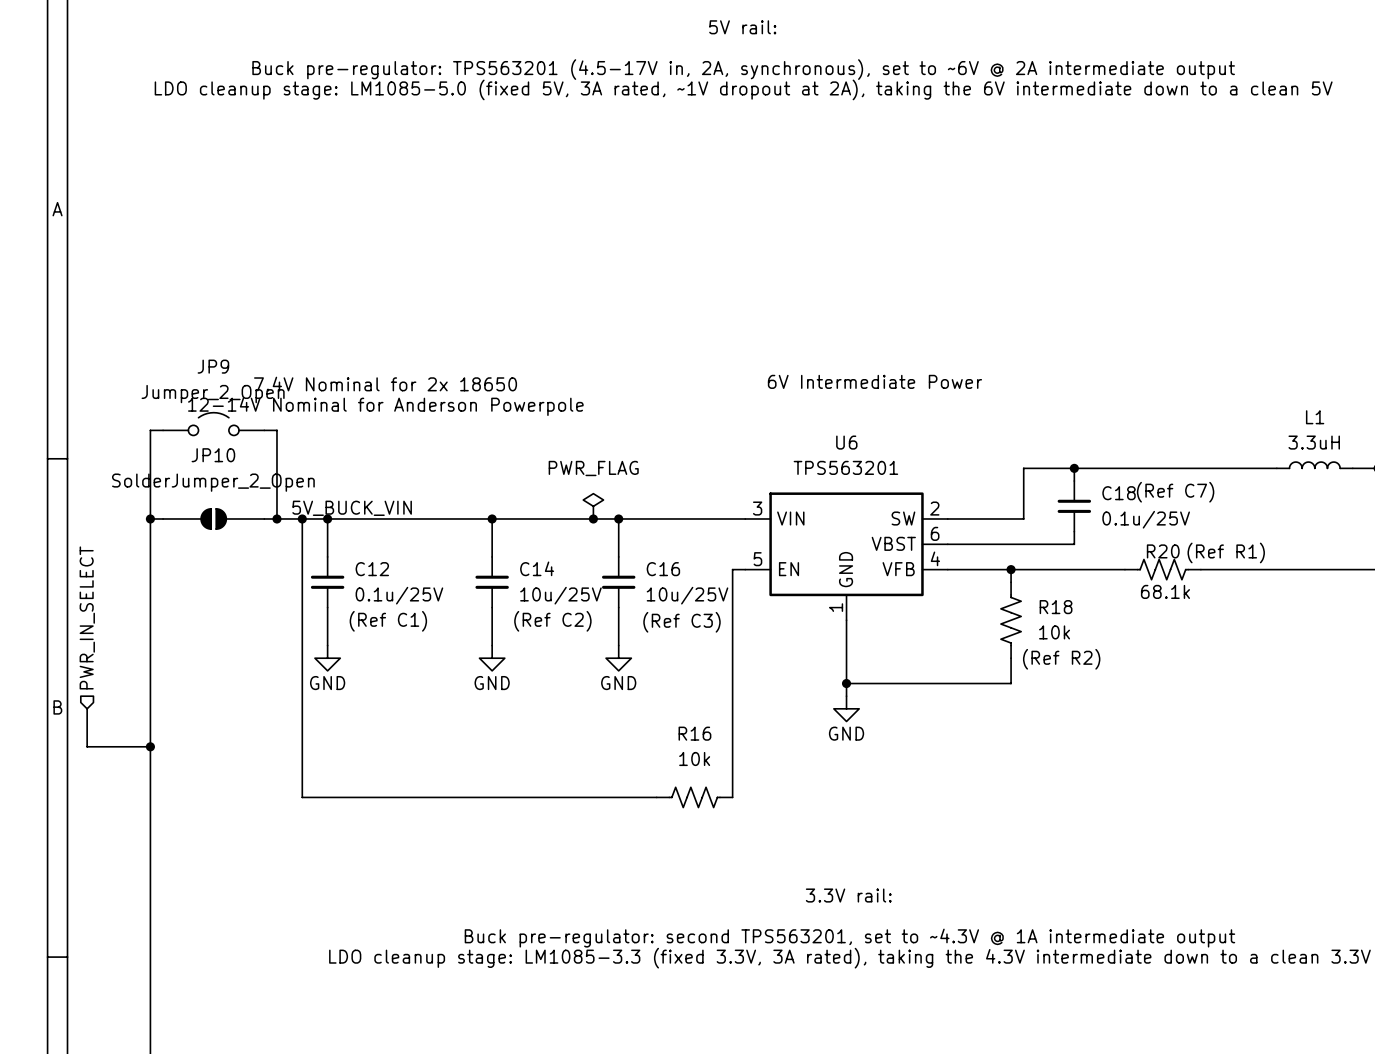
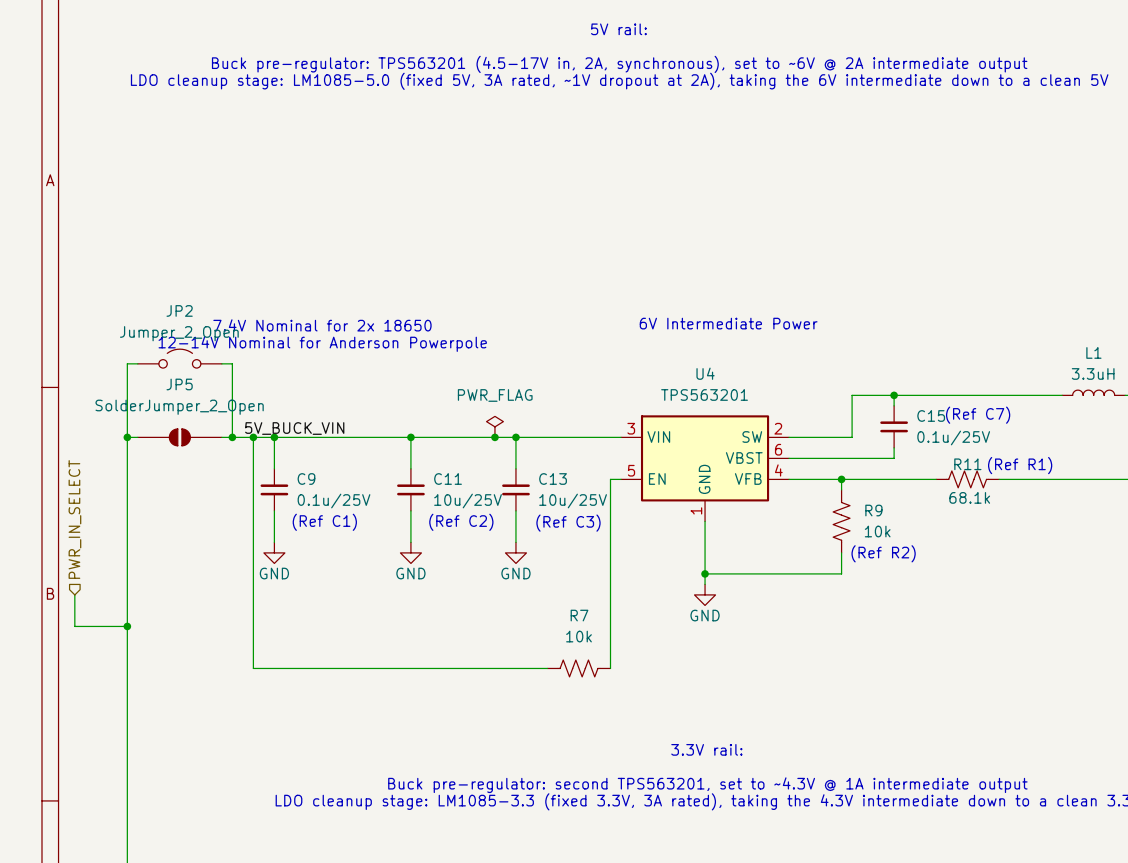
JP9 name: JP9 (213, 366) -> JP2 (179, 310)
U6 name: U6 (846, 442) -> U4 (705, 373)
JP10 name: JP10 (213, 455) -> JP5 (179, 384)
C18 name: C18 (1119, 493) -> C15 (931, 415)
R20 name: R20 (1163, 551) -> R11 (967, 464)
C14 name: C14 (537, 568) -> C11 (448, 479)
C12 name: C12 (372, 569) -> C9 (306, 479)
C16 name: C16 (663, 569) -> C13 (553, 479)
R18 name: R18 (1056, 607) -> R9 (873, 510)
R16 name: R16 (694, 733) -> R7 (579, 615)

